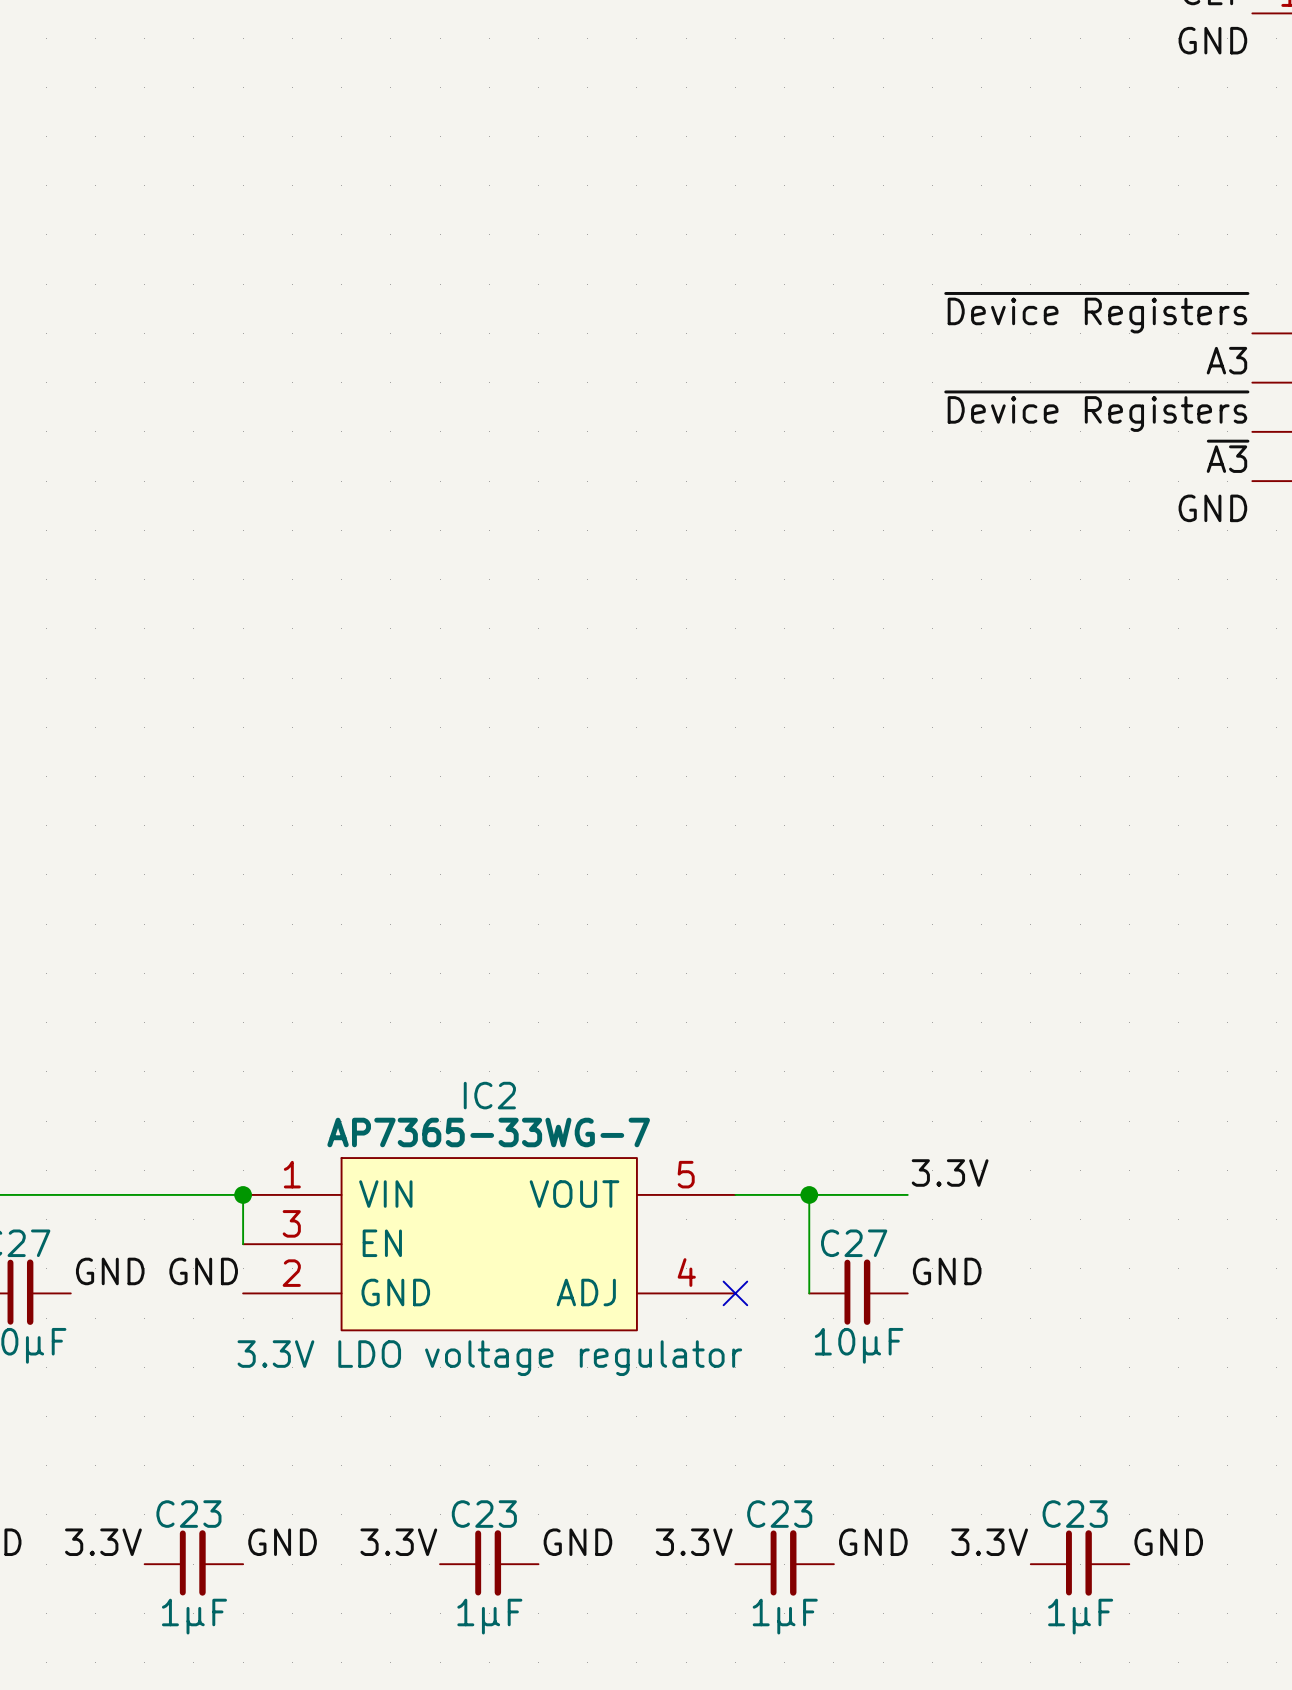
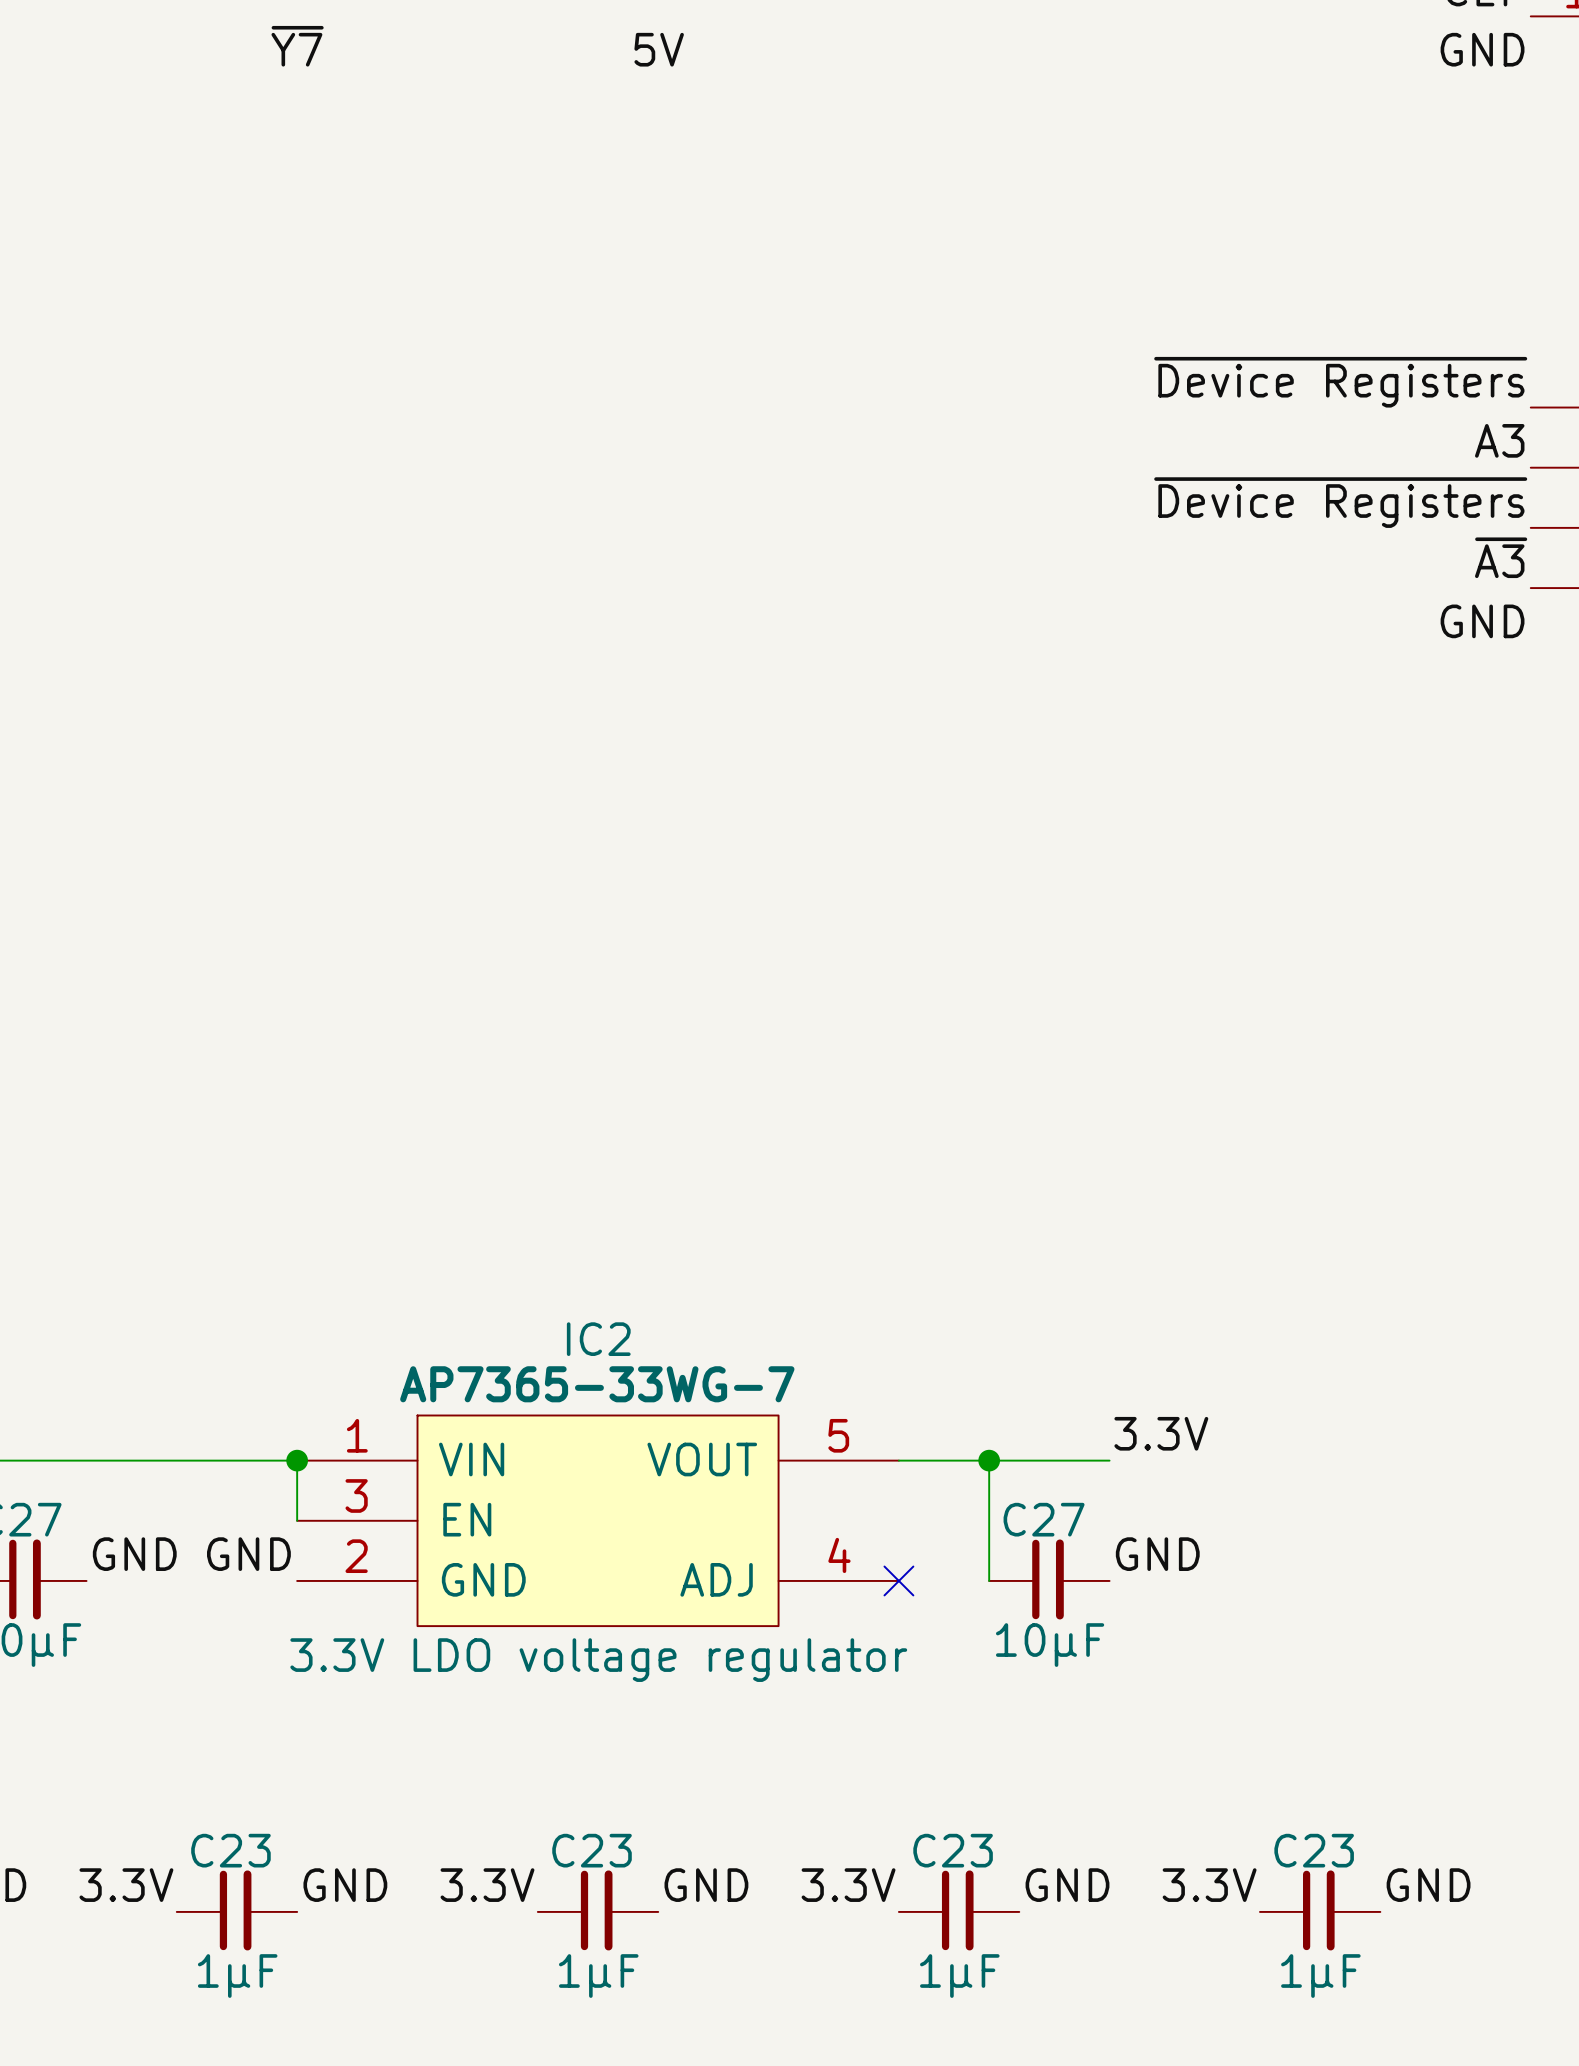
label: none -> ~{Y7} (297, 46)
label: none -> 5V (659, 49)

